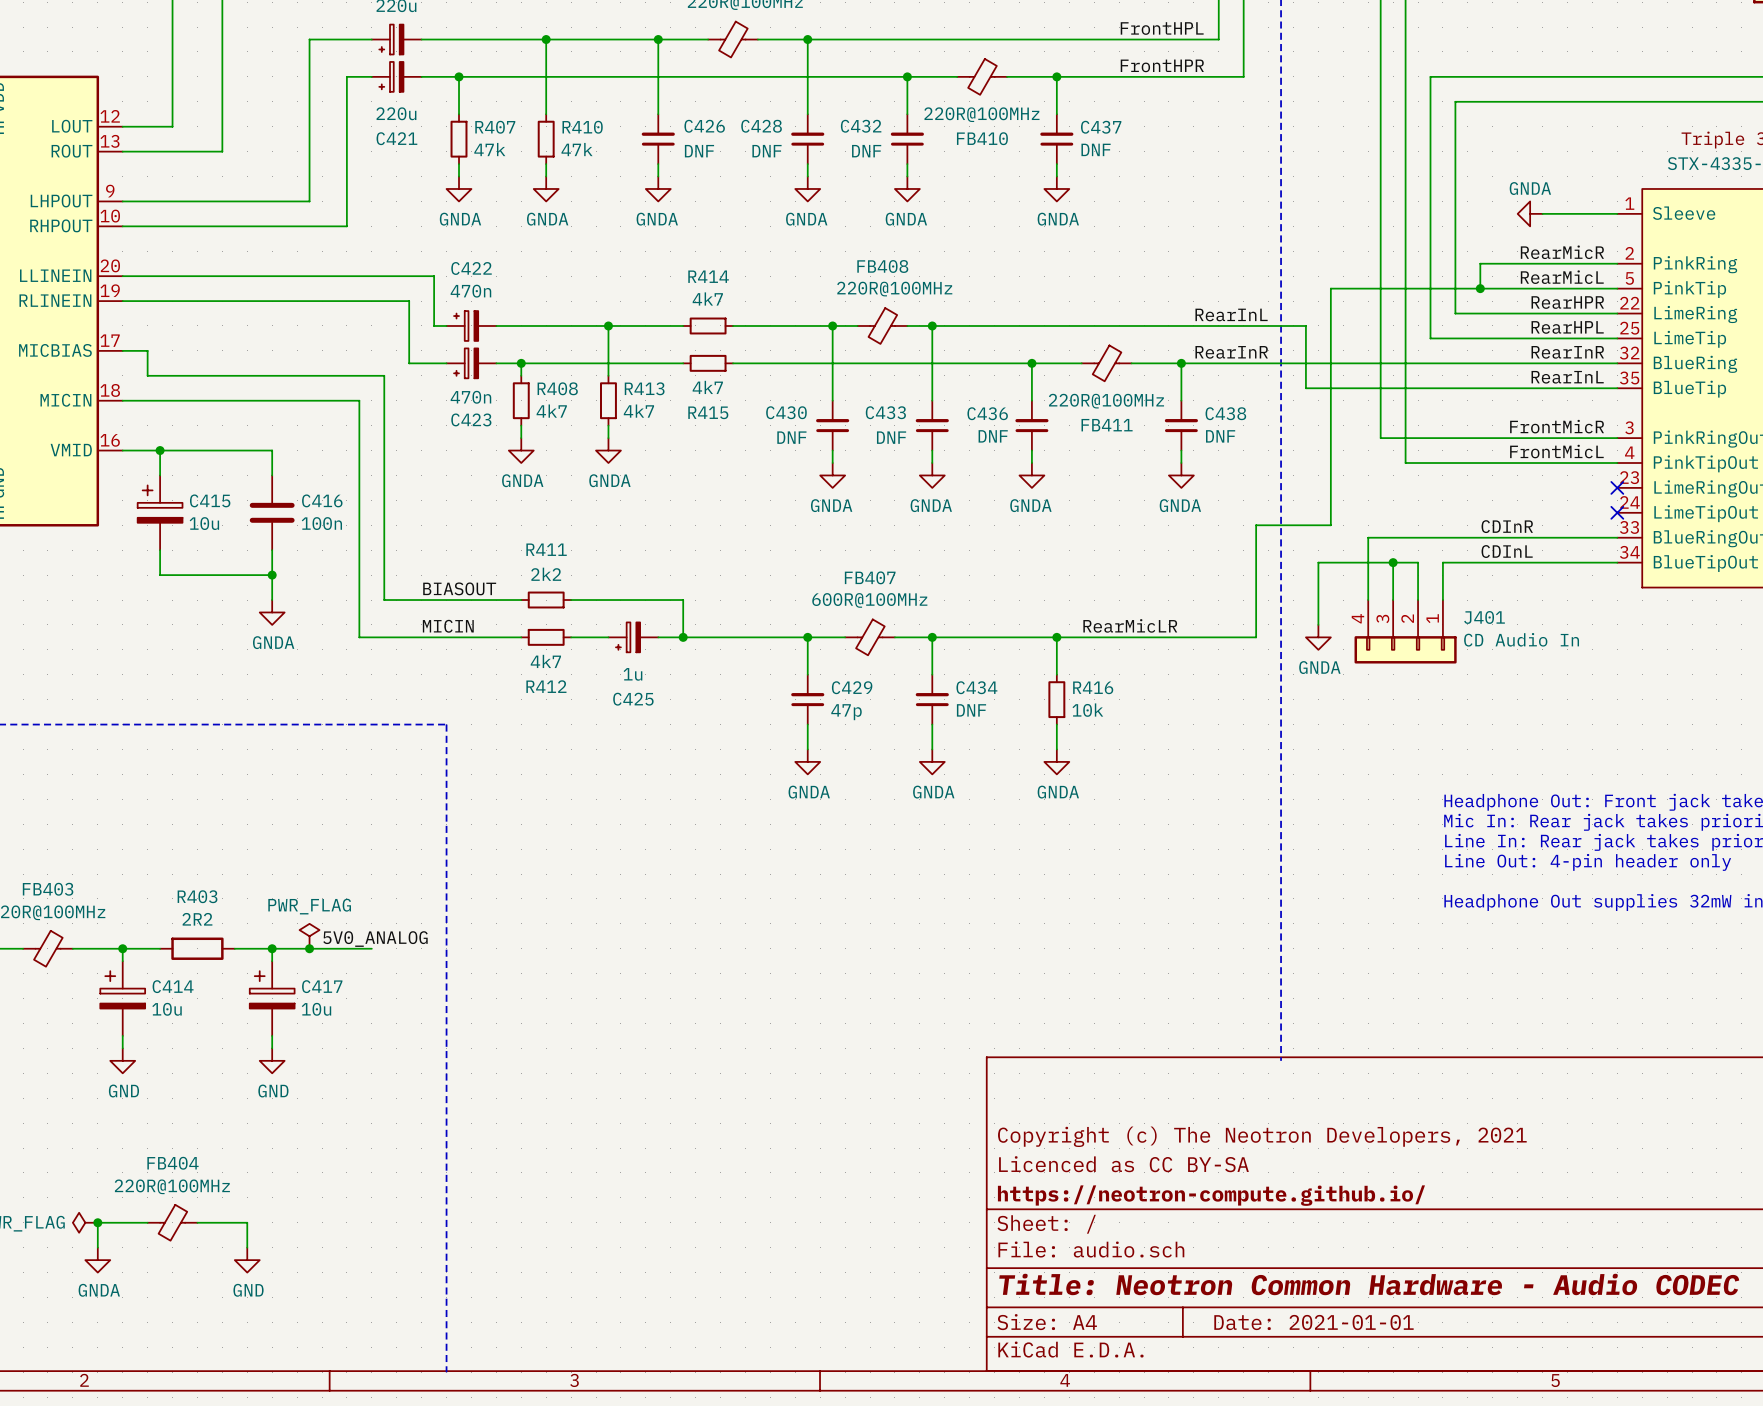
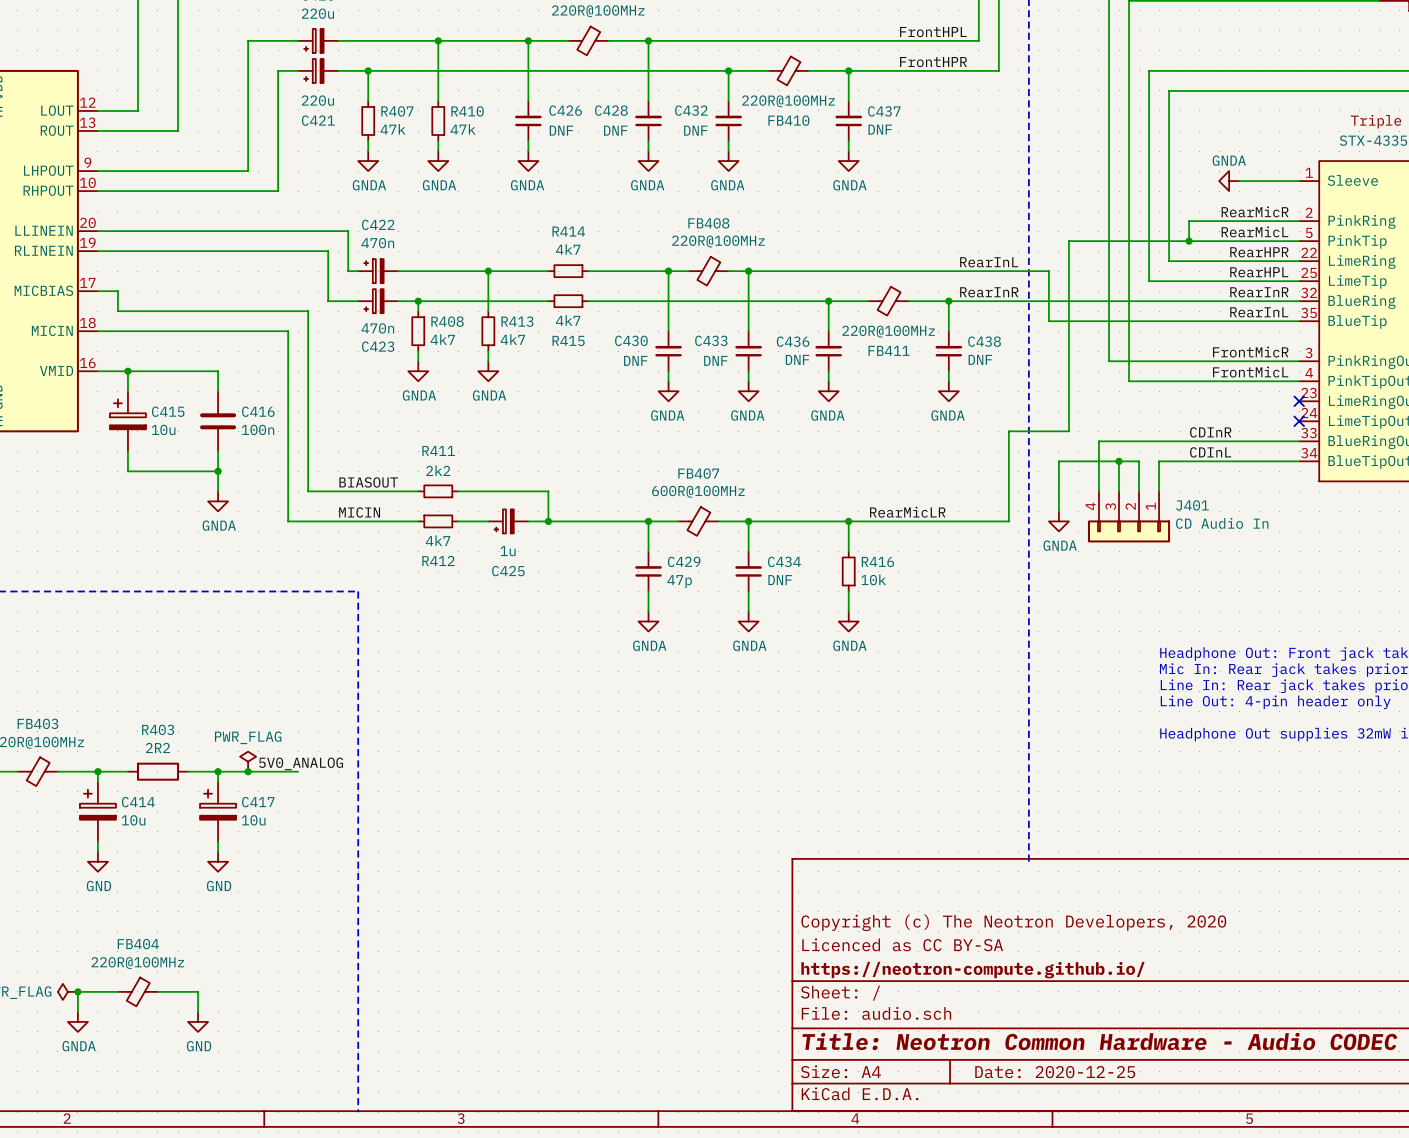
title block: Copyright (c) The Neotron Developers, 2021 (1262, 1136) -> Copyright (c) The Neotron Developers, 2020 (1013, 922)
title block: Date: 2021-01-01 (1313, 1322) -> Date: 2020-12-25 (1055, 1072)

